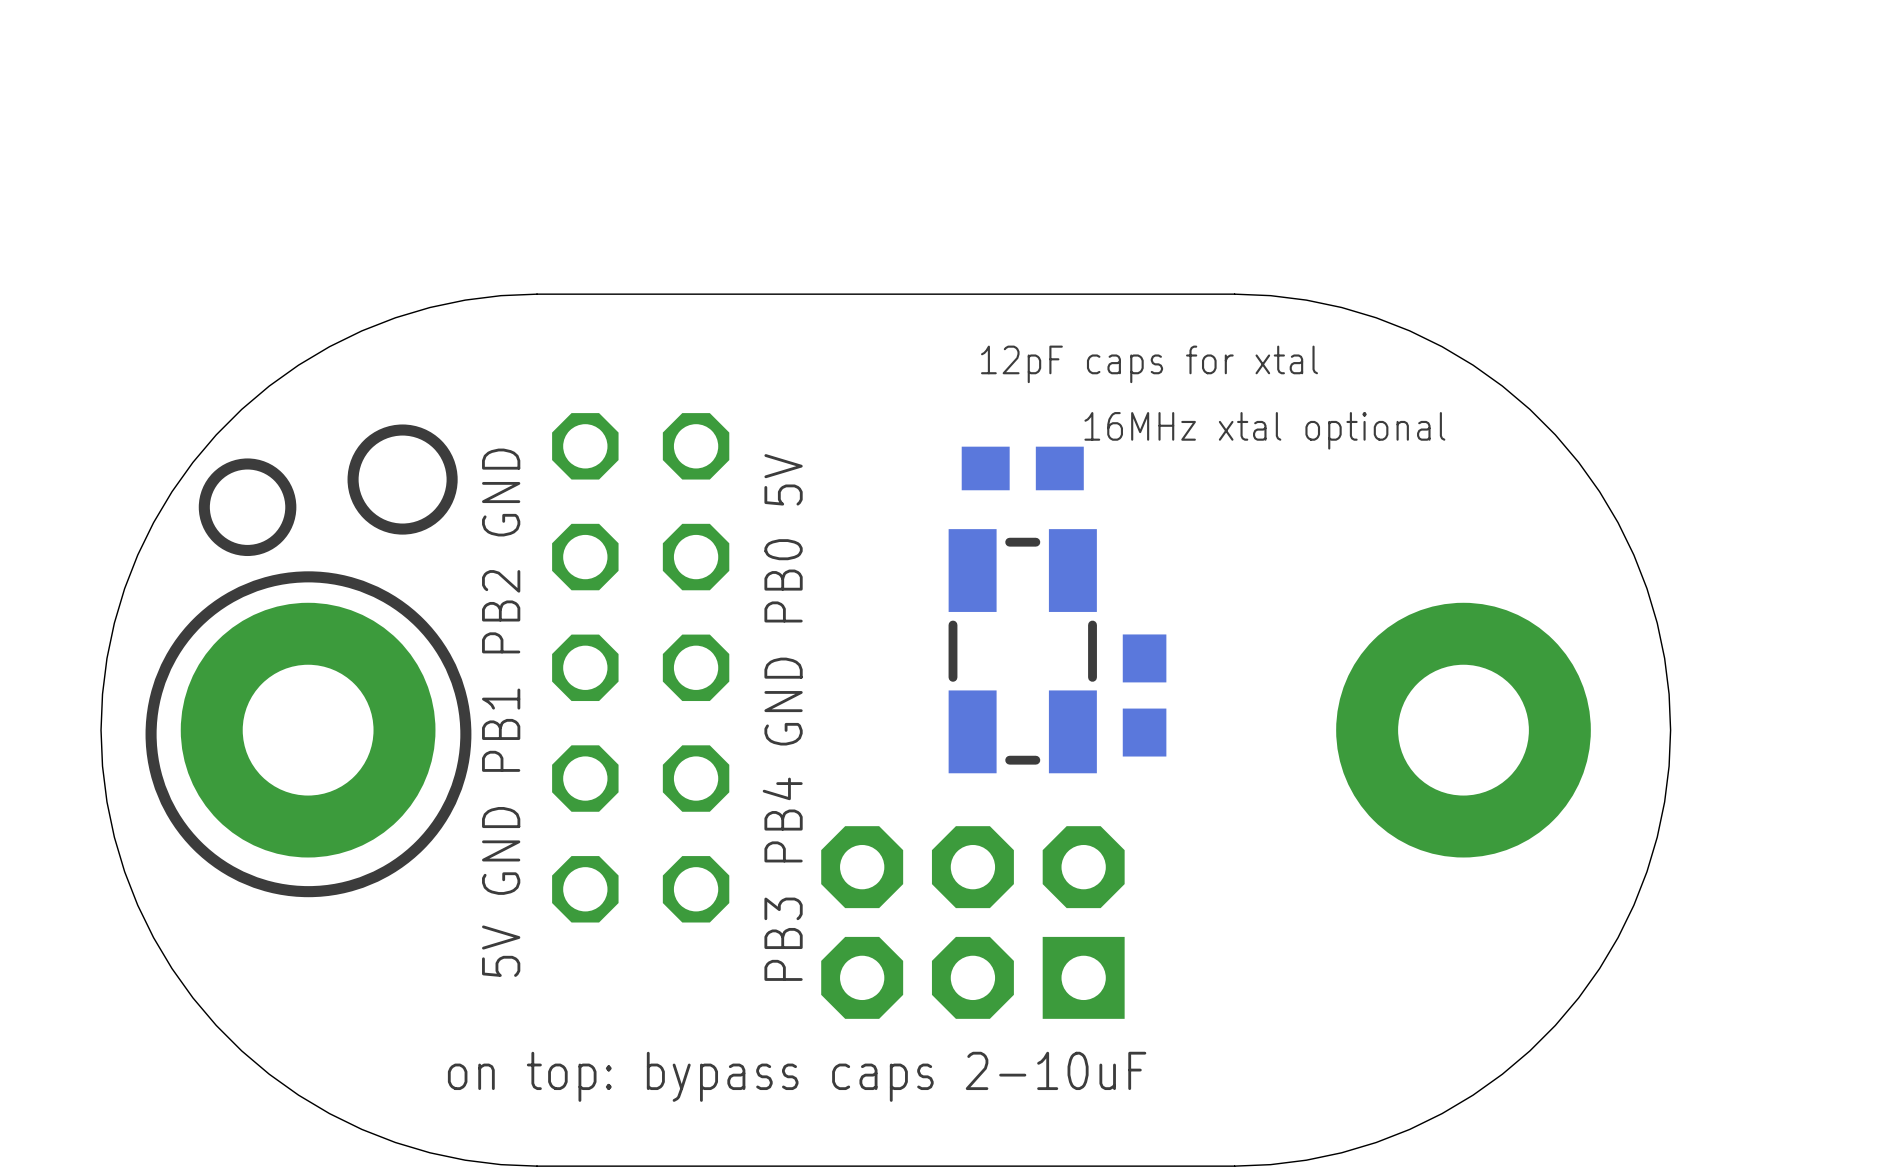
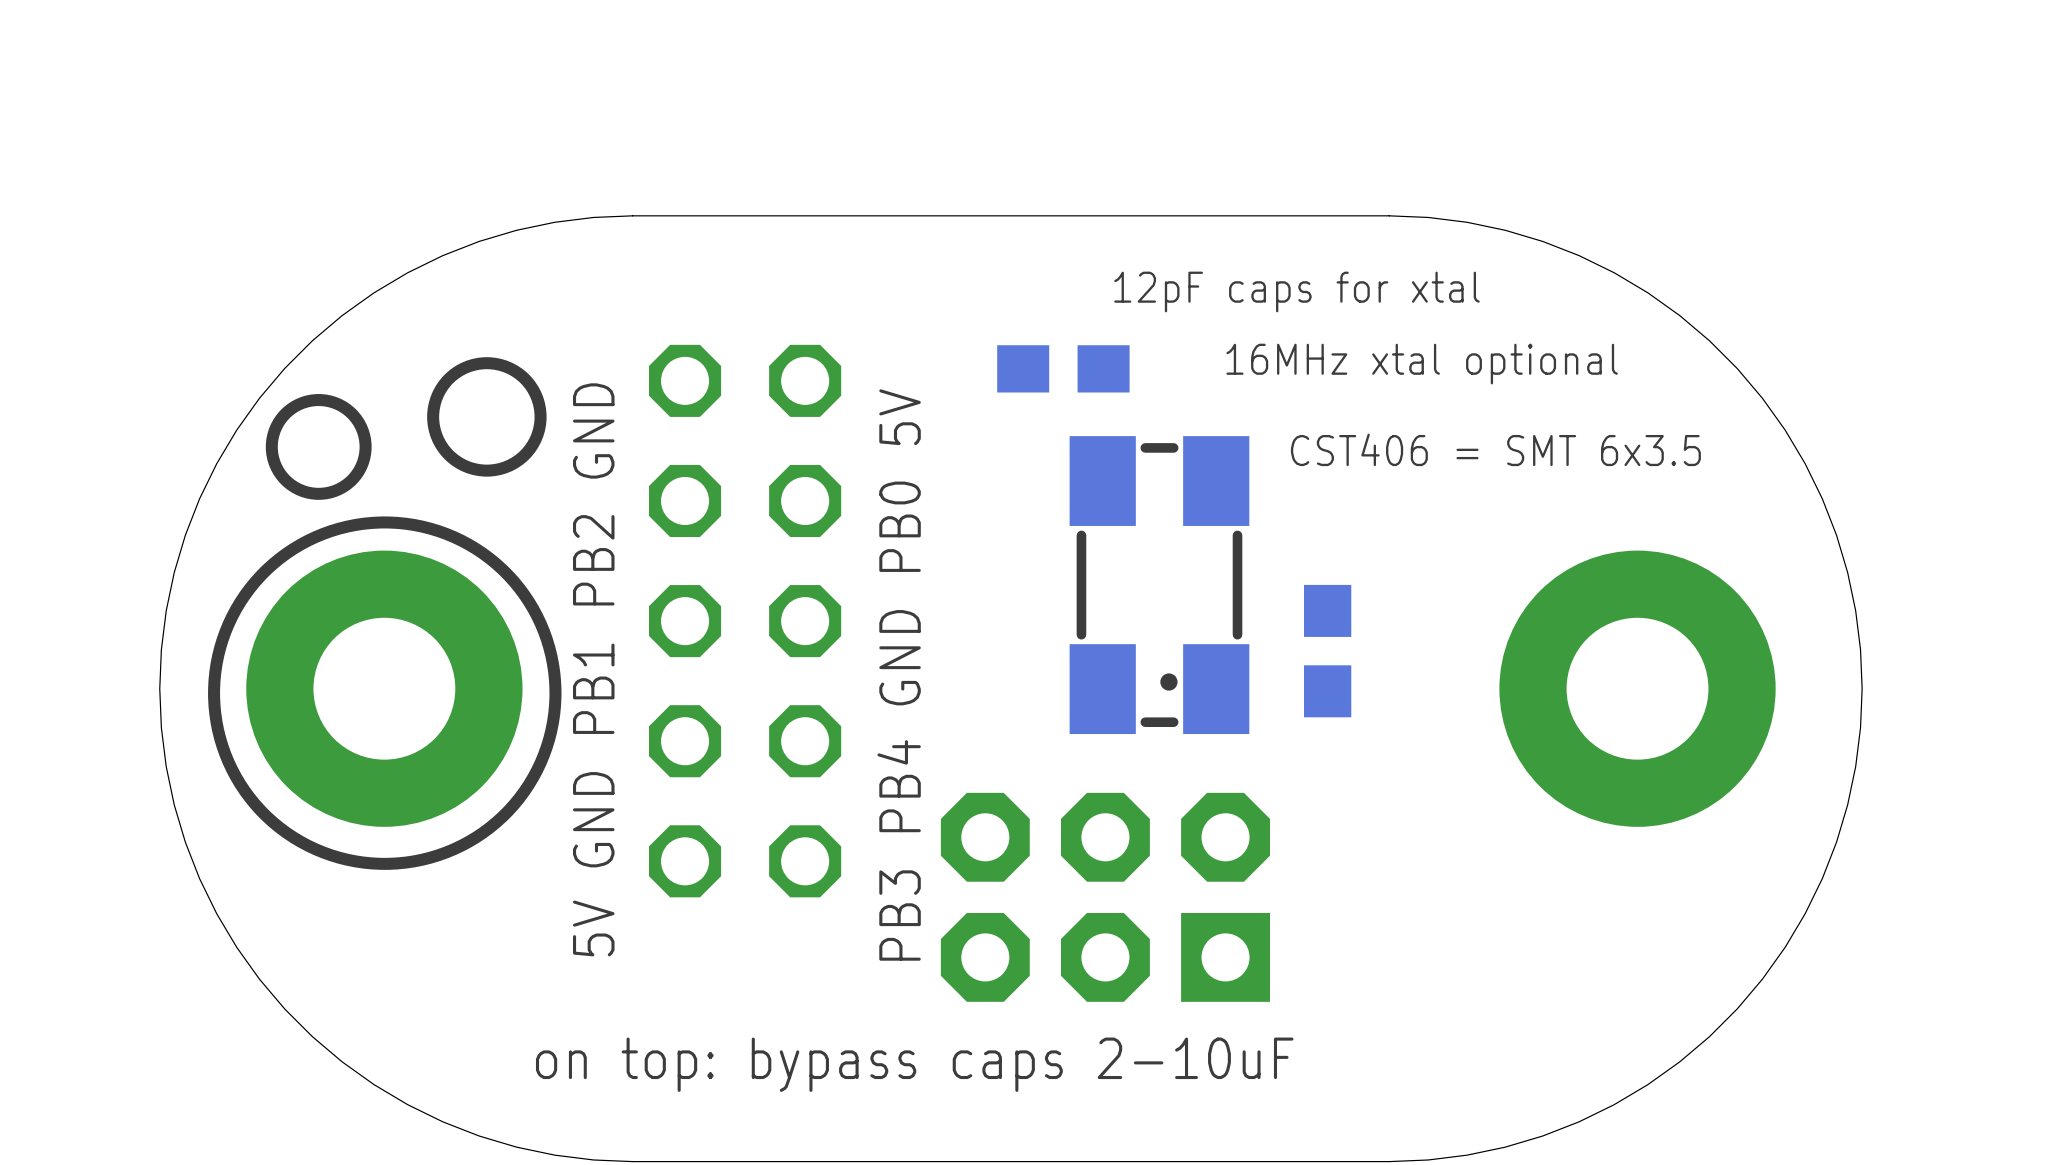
part position: (1022, 468) -> (1063, 368)
text: none -> CST406 = SMT 6x3.5 (1495, 449)
part footprint: [948, 529, 1097, 774] -> [1069, 436, 1250, 735]
part position: (1144, 695) -> (1327, 651)

